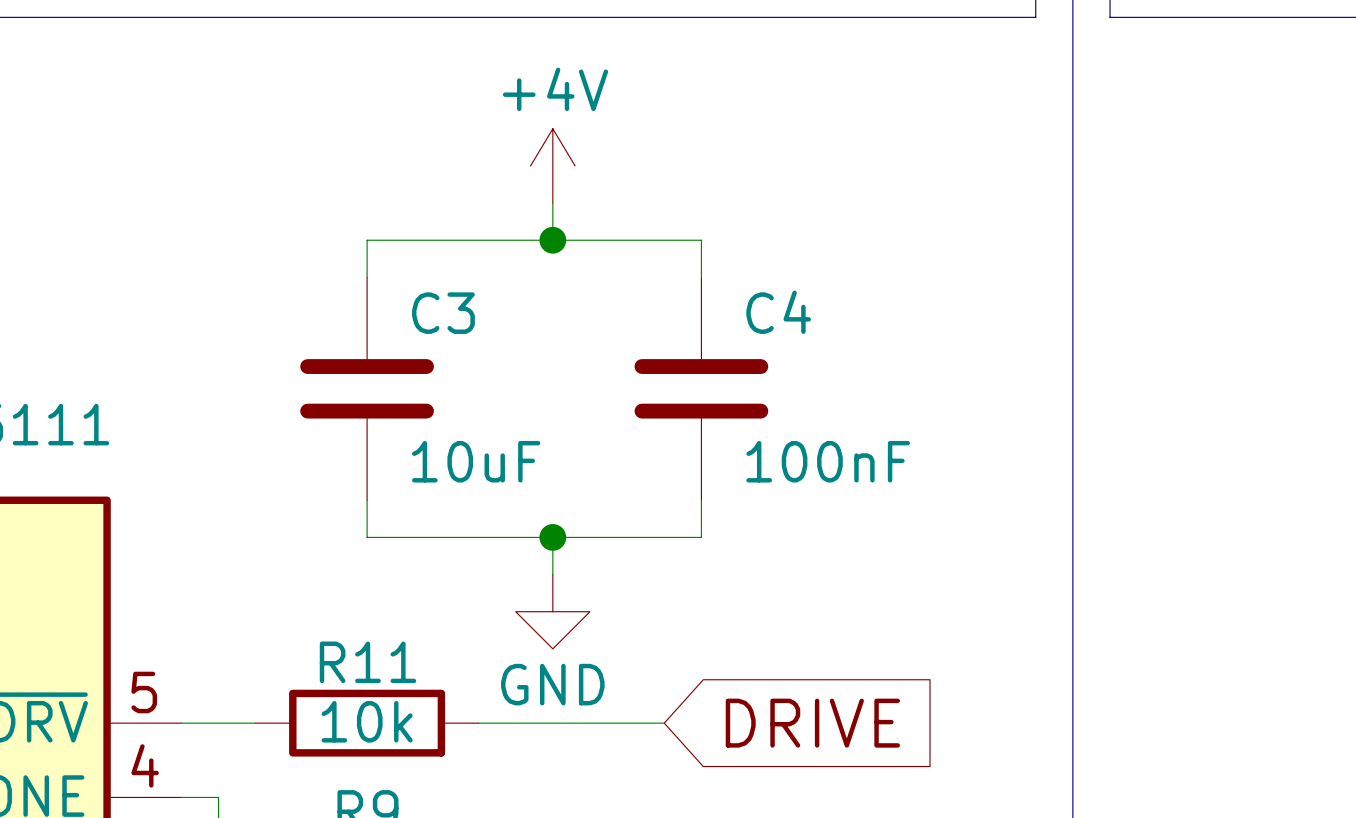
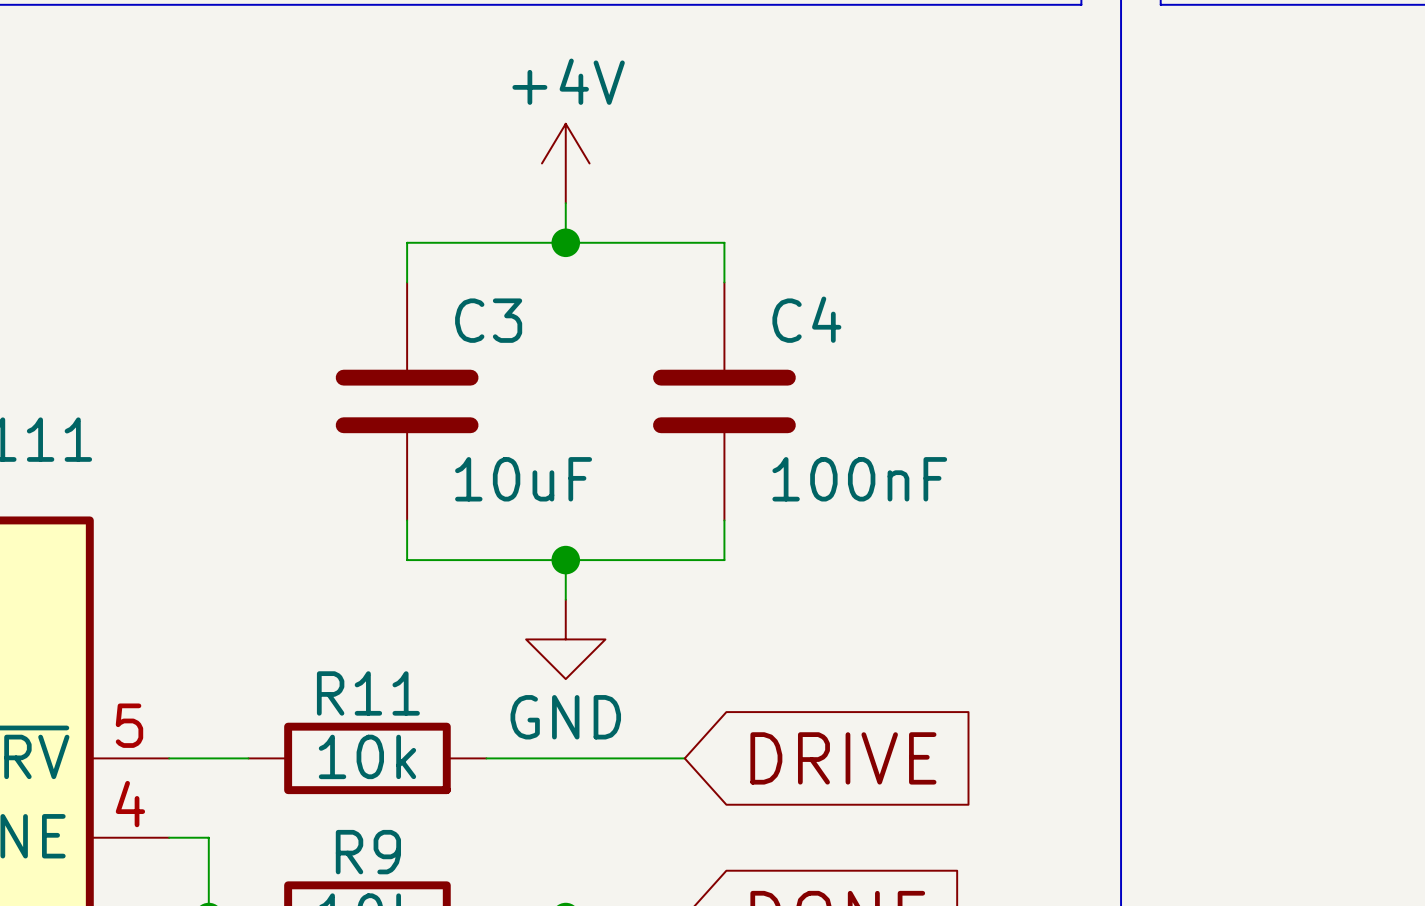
wire: (404, 240) (367, 240) (367, 277) -> (407, 242) (407, 282)
C3 position: (367, 388) -> (407, 401)
wire: (367, 500) (367, 537) (404, 537) -> (407, 520) (407, 560)

